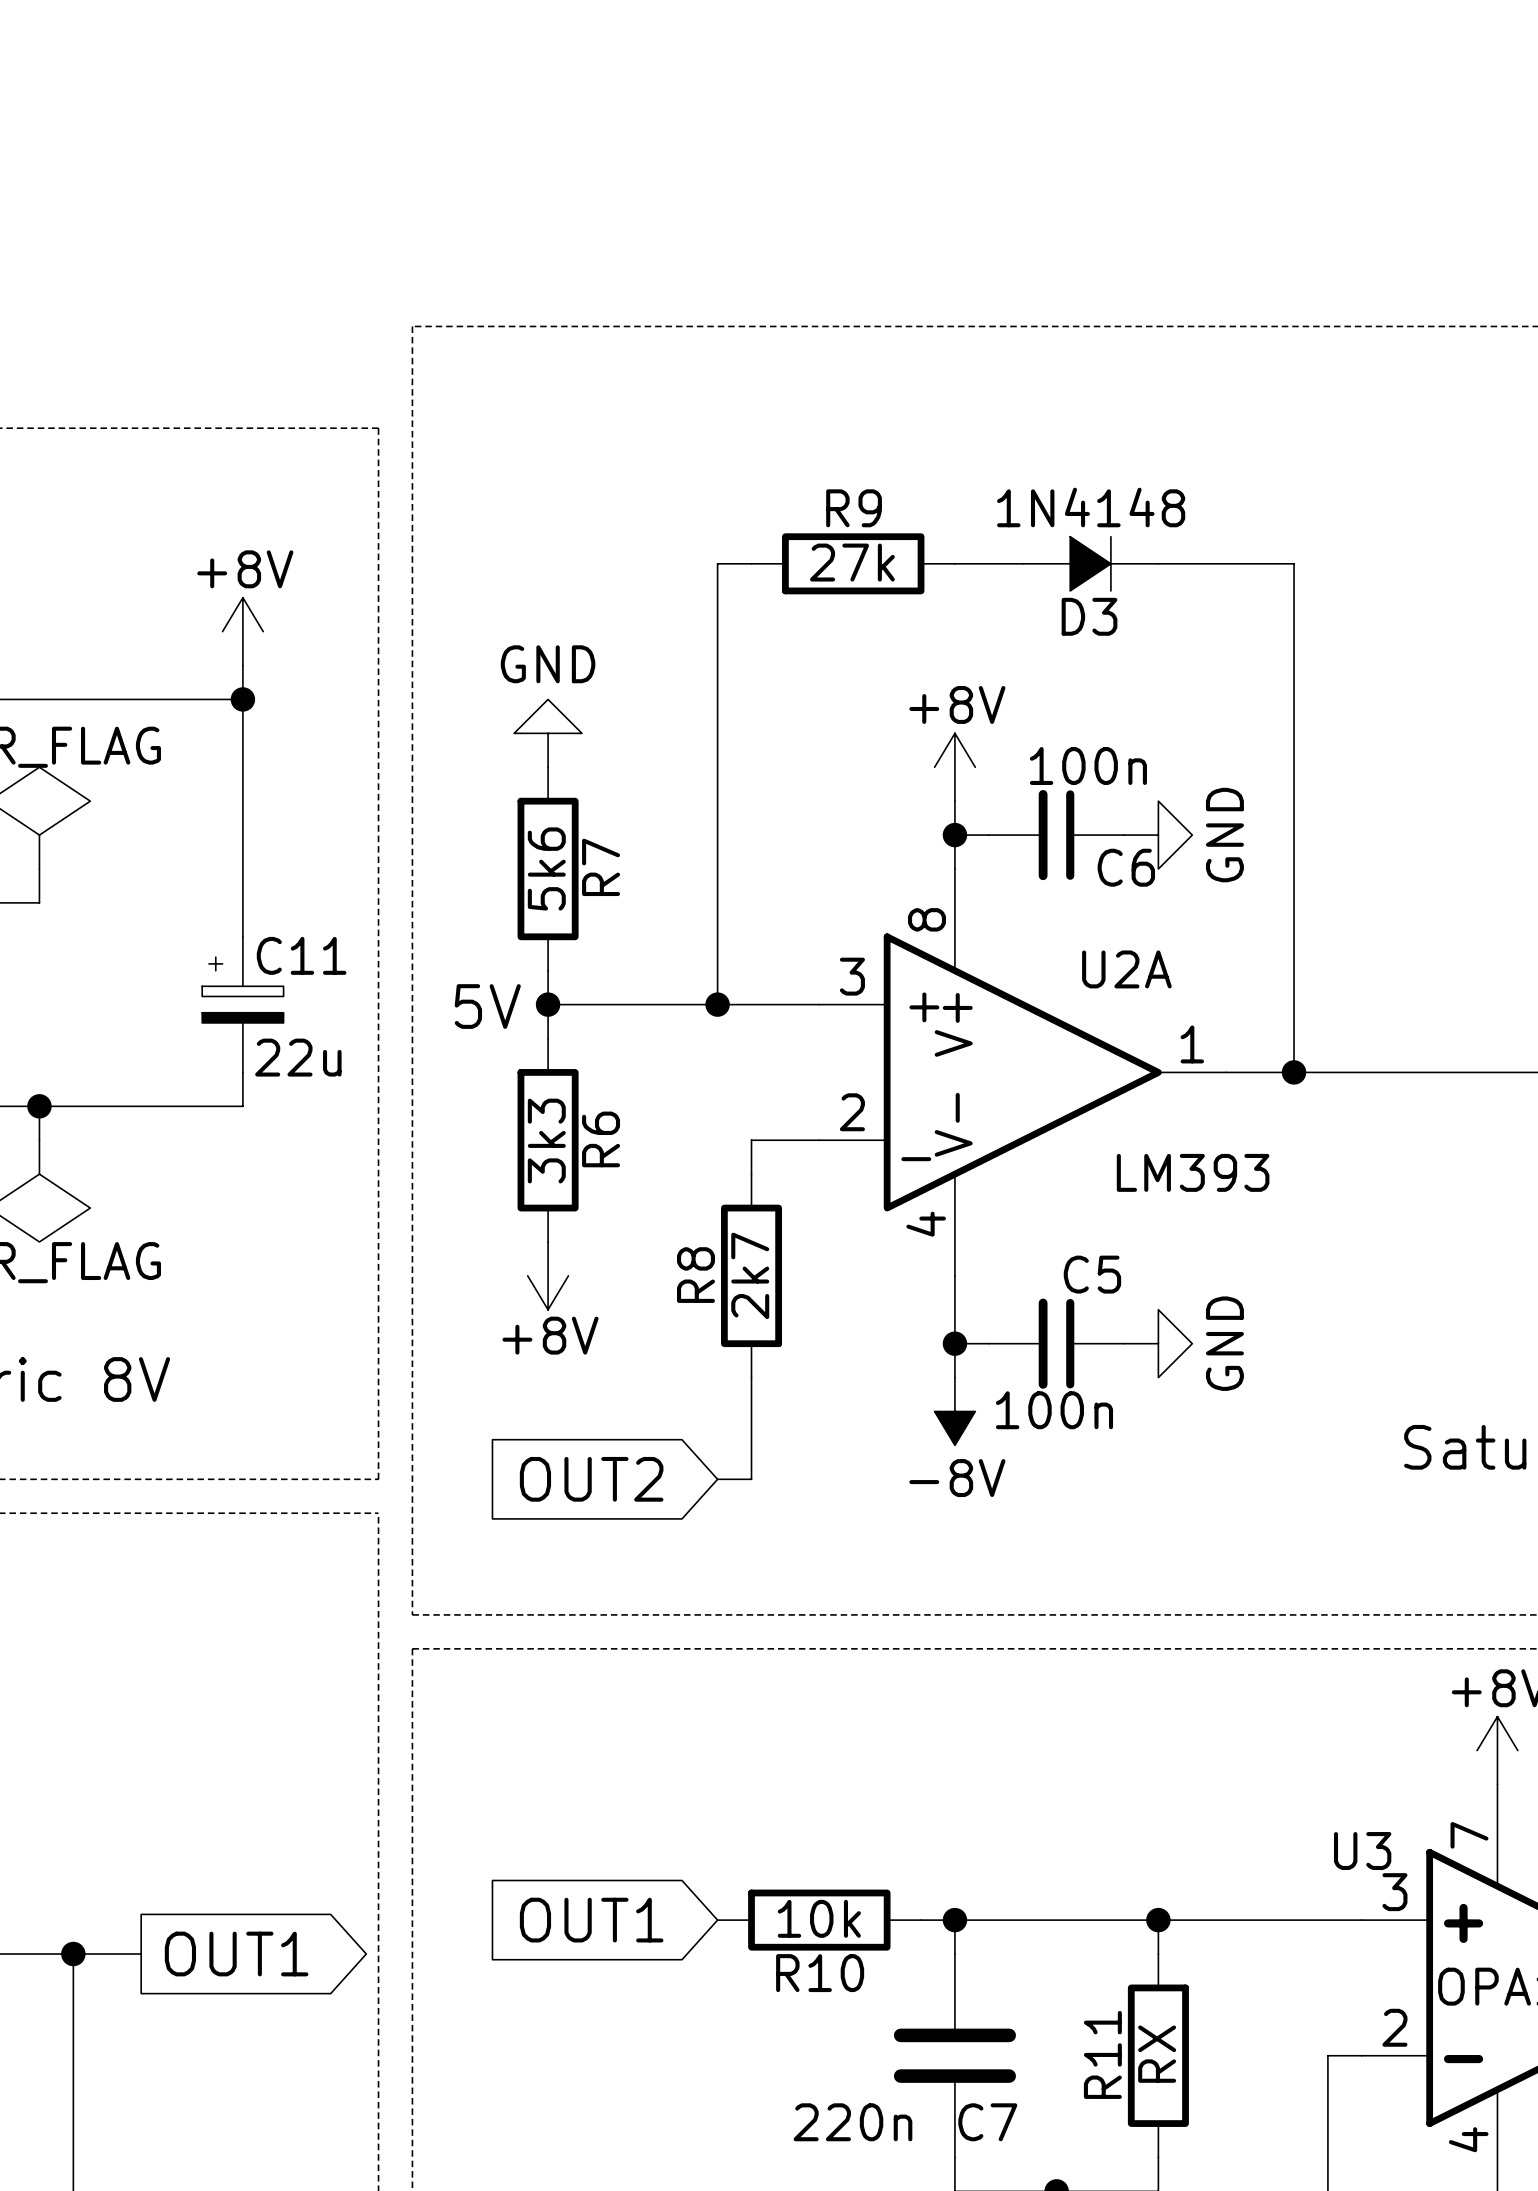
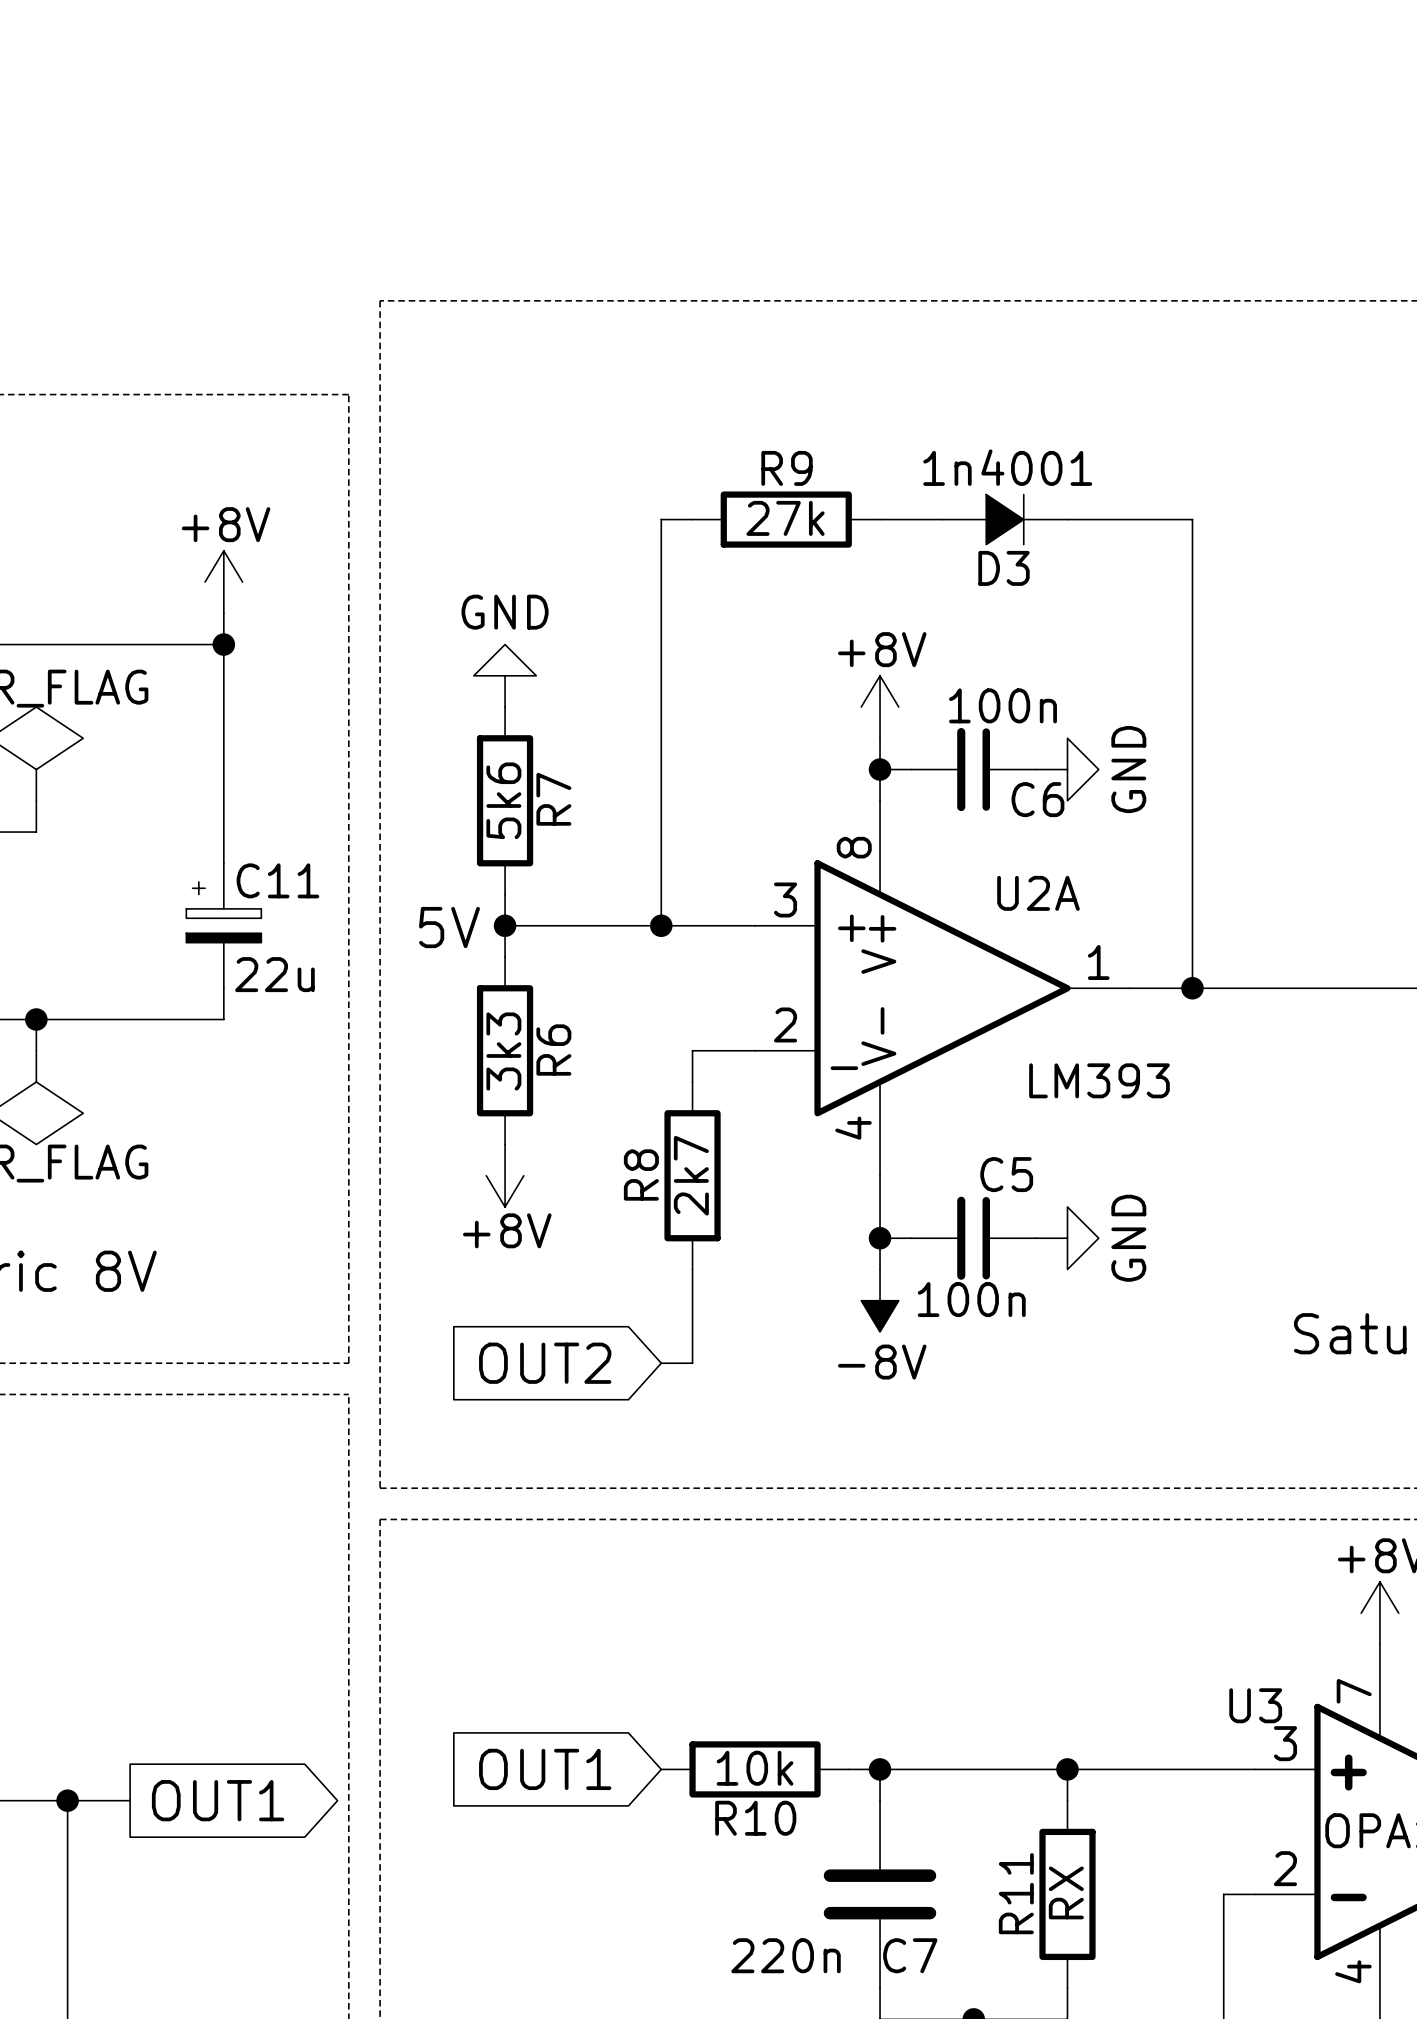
D3 value: 1N4148 (1091, 507) -> 1n4001 (1007, 467)

